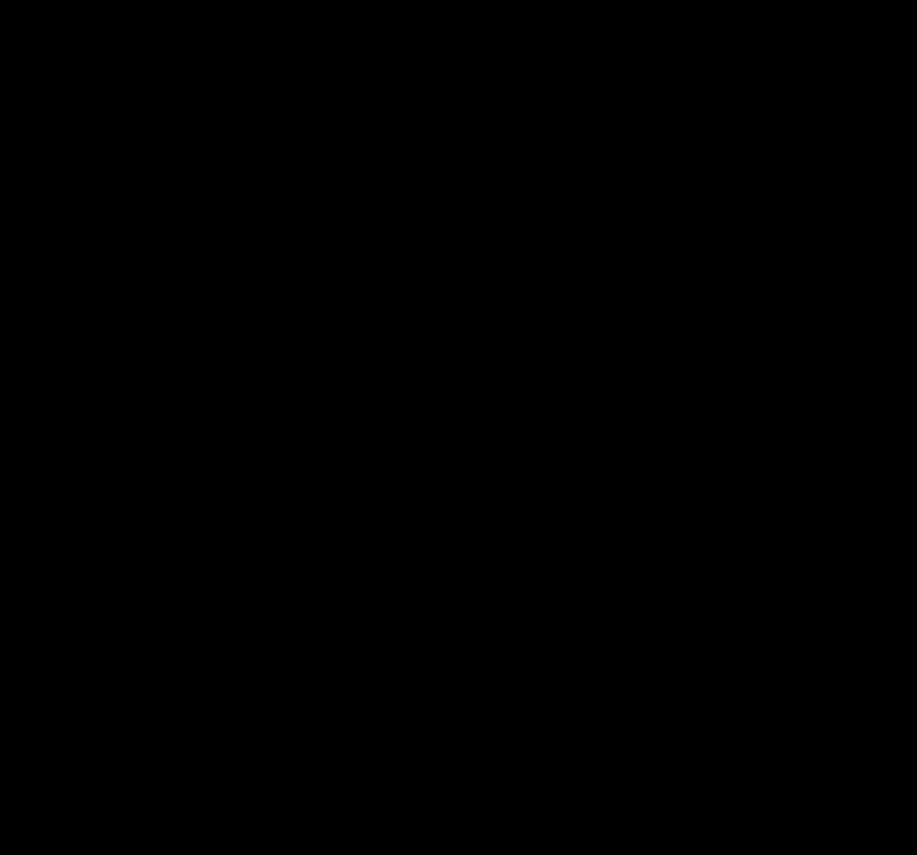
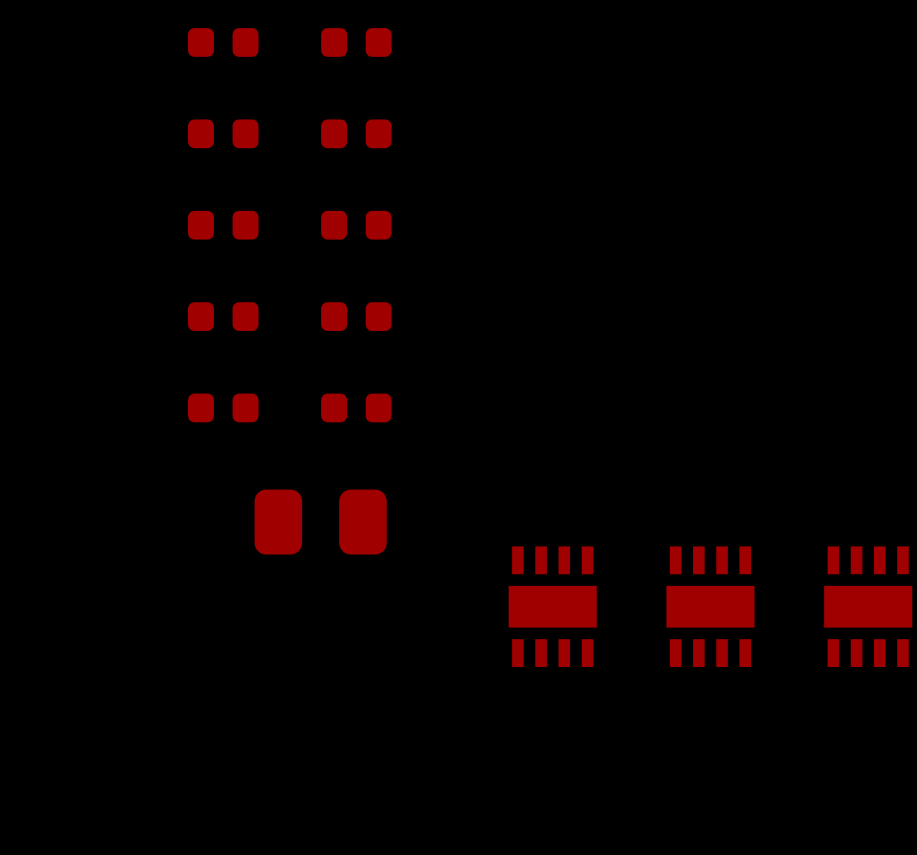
part: none -> (223, 42)
part: none -> (356, 42)
part: none -> (223, 133)
part: none -> (356, 133)
part: none -> (223, 225)
part: none -> (356, 225)
part: none -> (223, 316)
part: none -> (356, 316)
part: none -> (223, 407)
part: none -> (356, 407)
part: none -> (320, 522)
part: none -> (552, 606)
part: none -> (710, 606)
part: none -> (868, 606)

